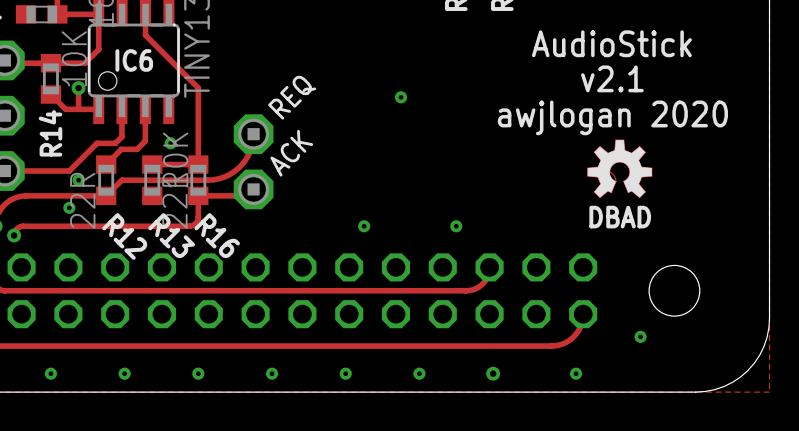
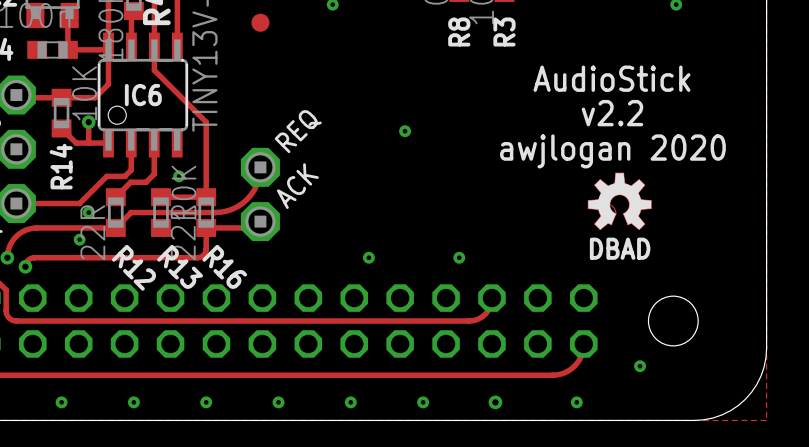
text: v2.1 (612, 78) -> v2.2 (612, 113)

